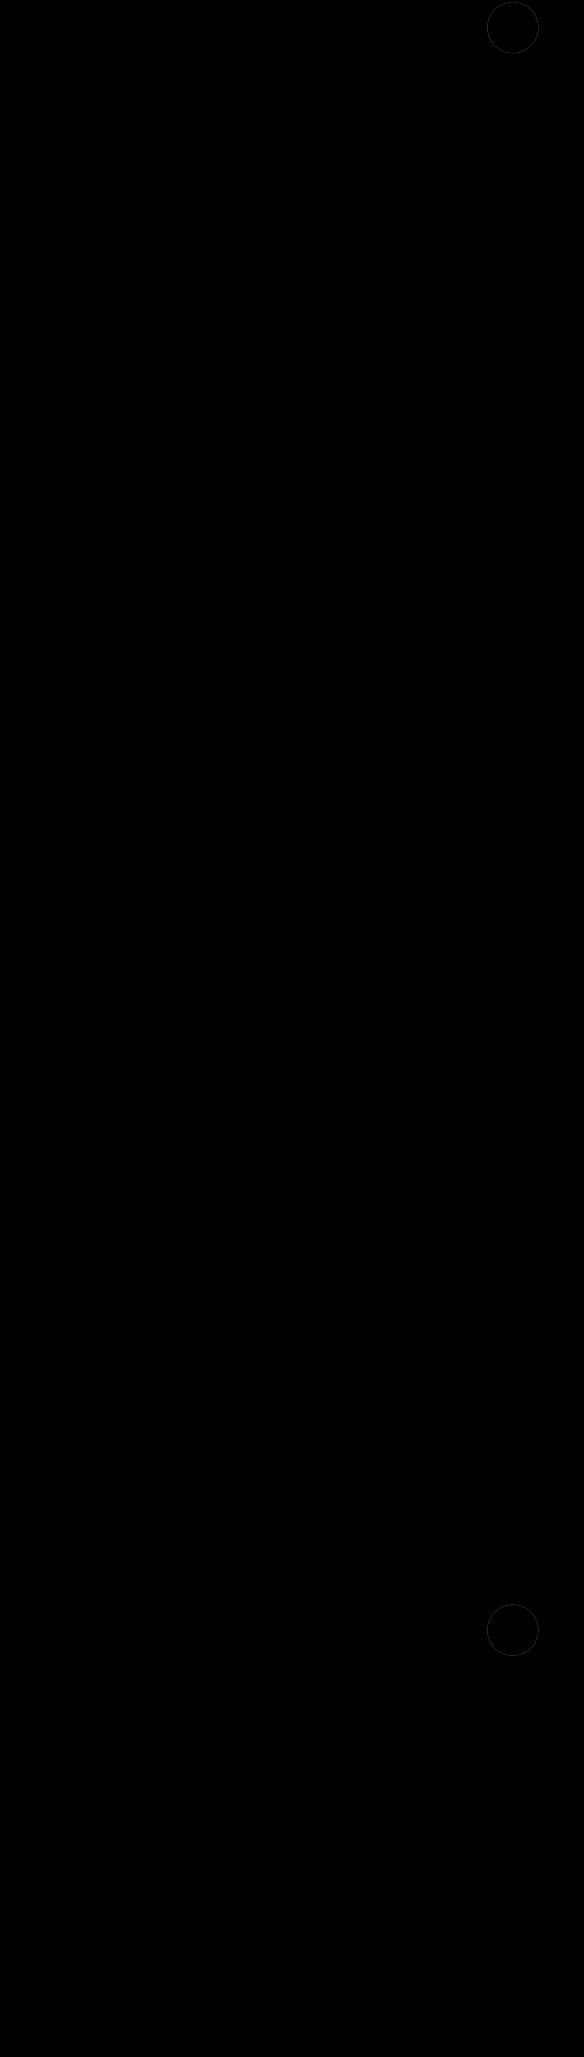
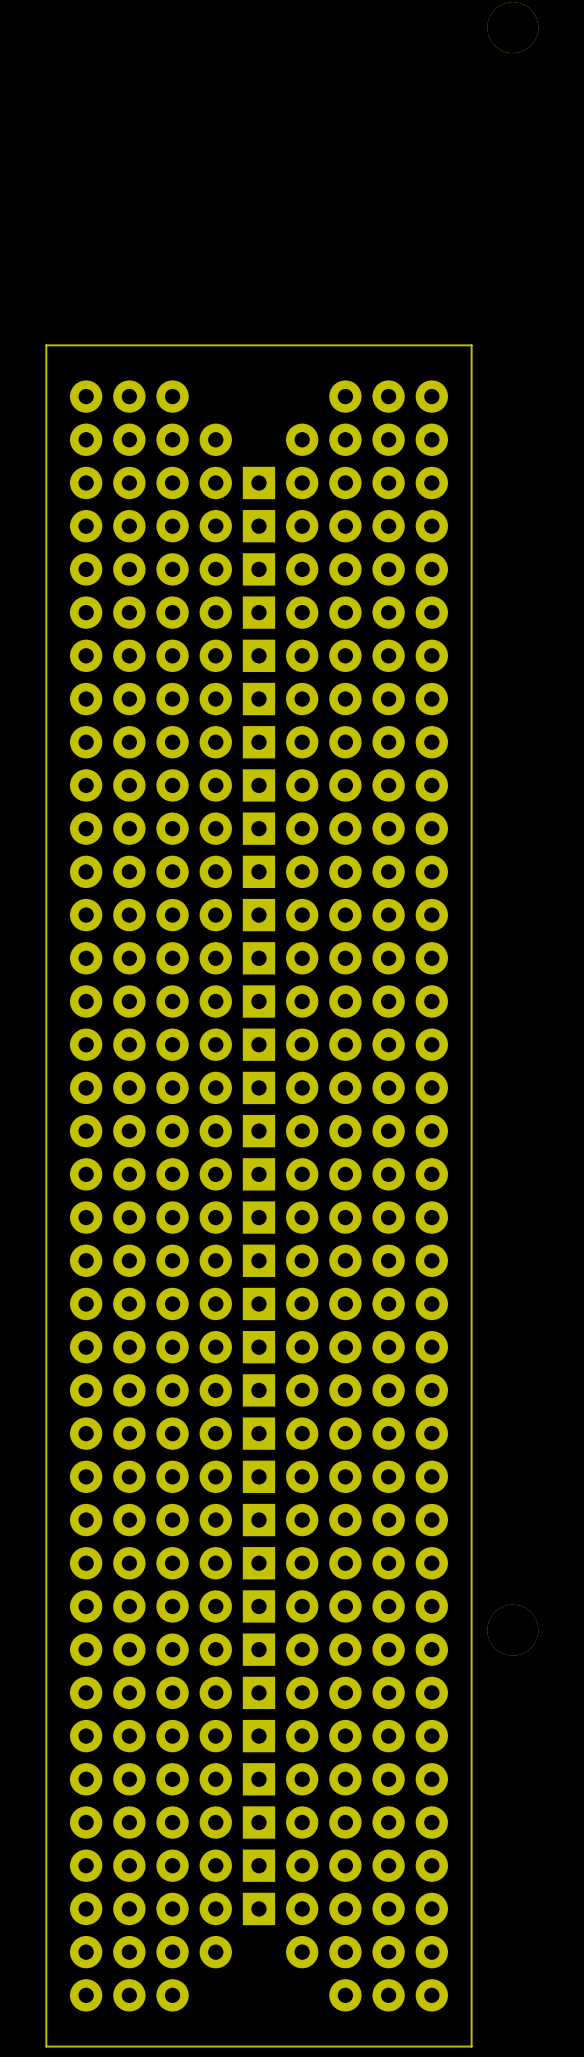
board edge: none -> (471, 345) (46, 345) (46, 2046) (471, 2046) (471, 345)
part: none -> (86, 396)
part: none -> (129, 396)
part: none -> (172, 396)
part: none -> (345, 396)
part: none -> (388, 396)
part: none -> (431, 396)
part: none -> (86, 439)
part: none -> (129, 439)
part: none -> (172, 439)
part: none -> (215, 439)
part: none -> (302, 439)
part: none -> (345, 439)
part: none -> (388, 439)
part: none -> (431, 439)
part: none -> (86, 482)
part: none -> (129, 482)
part: none -> (172, 482)
part: none -> (215, 482)
part: none -> (258, 482)
part: none -> (302, 482)
part: none -> (345, 482)
part: none -> (388, 482)
part: none -> (431, 482)
part: none -> (86, 526)
part: none -> (129, 526)
part: none -> (172, 526)
part: none -> (215, 526)
part: none -> (258, 526)
part: none -> (302, 526)
part: none -> (345, 526)
part: none -> (388, 526)
part: none -> (431, 526)
part: none -> (86, 569)
part: none -> (129, 569)
part: none -> (172, 569)
part: none -> (215, 569)
part: none -> (258, 569)
part: none -> (302, 569)
part: none -> (345, 569)
part: none -> (388, 569)
part: none -> (431, 569)
part: none -> (86, 612)
part: none -> (129, 612)
part: none -> (172, 612)
part: none -> (215, 612)
part: none -> (258, 612)
part: none -> (302, 612)
part: none -> (345, 612)
part: none -> (388, 612)
part: none -> (431, 612)
part: none -> (86, 655)
part: none -> (129, 655)
part: none -> (172, 655)
part: none -> (215, 655)
part: none -> (258, 655)
part: none -> (302, 655)
part: none -> (345, 655)
part: none -> (388, 655)
part: none -> (431, 655)
part: none -> (86, 699)
part: none -> (129, 699)
part: none -> (172, 699)
part: none -> (215, 699)
part: none -> (258, 699)
part: none -> (302, 699)
part: none -> (345, 699)
part: none -> (388, 699)
part: none -> (431, 699)
part: none -> (86, 742)
part: none -> (129, 742)
part: none -> (172, 742)
part: none -> (215, 742)
part: none -> (258, 742)
part: none -> (302, 742)
part: none -> (345, 742)
part: none -> (388, 742)
part: none -> (431, 742)
part: none -> (86, 785)
part: none -> (129, 785)
part: none -> (172, 785)
part: none -> (215, 785)
part: none -> (258, 785)
part: none -> (302, 785)
part: none -> (345, 785)
part: none -> (388, 785)
part: none -> (431, 785)
part: none -> (86, 828)
part: none -> (129, 828)
part: none -> (172, 828)
part: none -> (215, 828)
part: none -> (258, 828)
part: none -> (302, 828)
part: none -> (345, 828)
part: none -> (388, 828)
part: none -> (431, 828)
part: none -> (86, 871)
part: none -> (129, 871)
part: none -> (172, 871)
part: none -> (215, 871)
part: none -> (258, 871)
part: none -> (302, 871)
part: none -> (345, 871)
part: none -> (388, 871)
part: none -> (431, 871)
part: none -> (86, 915)
part: none -> (129, 915)
part: none -> (172, 915)
part: none -> (215, 915)
part: none -> (258, 915)
part: none -> (302, 915)
part: none -> (345, 915)
part: none -> (388, 915)
part: none -> (431, 915)
part: none -> (86, 958)
part: none -> (129, 958)
part: none -> (172, 958)
part: none -> (215, 958)
part: none -> (258, 958)
part: none -> (302, 958)
part: none -> (345, 958)
part: none -> (388, 958)
part: none -> (431, 958)
part: none -> (86, 1001)
part: none -> (129, 1001)
part: none -> (172, 1001)
part: none -> (215, 1001)
part: none -> (258, 1001)
part: none -> (302, 1001)
part: none -> (345, 1001)
part: none -> (388, 1001)
part: none -> (431, 1001)
part: none -> (86, 1044)
part: none -> (129, 1044)
part: none -> (172, 1044)
part: none -> (215, 1044)
part: none -> (258, 1044)
part: none -> (302, 1044)
part: none -> (345, 1044)
part: none -> (388, 1044)
part: none -> (431, 1044)
part: none -> (86, 1087)
part: none -> (129, 1087)
part: none -> (172, 1087)
part: none -> (215, 1087)
part: none -> (258, 1087)
part: none -> (302, 1087)
part: none -> (345, 1087)
part: none -> (388, 1087)
part: none -> (431, 1087)
part: none -> (86, 1131)
part: none -> (129, 1131)
part: none -> (172, 1131)
part: none -> (215, 1131)
part: none -> (258, 1131)
part: none -> (302, 1131)
part: none -> (345, 1131)
part: none -> (388, 1131)
part: none -> (431, 1131)
part: none -> (86, 1174)
part: none -> (129, 1174)
part: none -> (172, 1174)
part: none -> (215, 1174)
part: none -> (258, 1174)
part: none -> (302, 1174)
part: none -> (345, 1174)
part: none -> (388, 1174)
part: none -> (431, 1174)
part: none -> (86, 1217)
part: none -> (129, 1217)
part: none -> (172, 1217)
part: none -> (215, 1217)
part: none -> (258, 1217)
part: none -> (302, 1217)
part: none -> (345, 1217)
part: none -> (388, 1217)
part: none -> (431, 1217)
part: none -> (86, 1260)
part: none -> (129, 1260)
part: none -> (172, 1260)
part: none -> (215, 1260)
part: none -> (258, 1260)
part: none -> (302, 1260)
part: none -> (345, 1260)
part: none -> (388, 1260)
part: none -> (431, 1260)
part: none -> (86, 1303)
part: none -> (129, 1303)
part: none -> (172, 1303)
part: none -> (215, 1303)
part: none -> (258, 1303)
part: none -> (302, 1303)
part: none -> (345, 1303)
part: none -> (388, 1303)
part: none -> (431, 1303)
part: none -> (86, 1347)
part: none -> (129, 1347)
part: none -> (172, 1347)
part: none -> (215, 1347)
part: none -> (258, 1347)
part: none -> (302, 1347)
part: none -> (345, 1347)
part: none -> (388, 1347)
part: none -> (431, 1347)
part: none -> (86, 1390)
part: none -> (129, 1390)
part: none -> (172, 1390)
part: none -> (215, 1390)
part: none -> (258, 1390)
part: none -> (302, 1390)
part: none -> (345, 1390)
part: none -> (388, 1390)
part: none -> (431, 1390)
part: none -> (86, 1433)
part: none -> (129, 1433)
part: none -> (172, 1433)
part: none -> (215, 1433)
part: none -> (258, 1433)
part: none -> (302, 1433)
part: none -> (345, 1433)
part: none -> (388, 1433)
part: none -> (431, 1433)
part: none -> (86, 1476)
part: none -> (129, 1476)
part: none -> (172, 1476)
part: none -> (215, 1476)
part: none -> (258, 1476)
part: none -> (302, 1476)
part: none -> (345, 1476)
part: none -> (388, 1476)
part: none -> (431, 1476)
part: none -> (86, 1520)
part: none -> (129, 1520)
part: none -> (172, 1520)
part: none -> (215, 1520)
part: none -> (258, 1520)
part: none -> (302, 1520)
part: none -> (345, 1520)
part: none -> (388, 1520)
part: none -> (431, 1520)
part: none -> (86, 1563)
part: none -> (129, 1563)
part: none -> (172, 1563)
part: none -> (215, 1563)
part: none -> (258, 1563)
part: none -> (302, 1563)
part: none -> (345, 1563)
part: none -> (388, 1563)
part: none -> (431, 1563)
part: none -> (86, 1606)
part: none -> (129, 1606)
part: none -> (172, 1606)
part: none -> (215, 1606)
part: none -> (258, 1606)
part: none -> (302, 1606)
part: none -> (345, 1606)
part: none -> (388, 1606)
part: none -> (431, 1606)
part: none -> (86, 1649)
part: none -> (129, 1649)
part: none -> (172, 1649)
part: none -> (215, 1649)
part: none -> (258, 1649)
part: none -> (302, 1649)
part: none -> (345, 1649)
part: none -> (388, 1649)
part: none -> (431, 1649)
part: none -> (86, 1692)
part: none -> (129, 1692)
part: none -> (172, 1692)
part: none -> (215, 1692)
part: none -> (258, 1692)
part: none -> (302, 1692)
part: none -> (345, 1692)
part: none -> (388, 1692)
part: none -> (431, 1692)
part: none -> (86, 1736)
part: none -> (129, 1736)
part: none -> (172, 1736)
part: none -> (215, 1736)
part: none -> (258, 1736)
part: none -> (302, 1736)
part: none -> (345, 1736)
part: none -> (388, 1736)
part: none -> (431, 1736)
part: none -> (86, 1779)
part: none -> (129, 1779)
part: none -> (172, 1779)
part: none -> (215, 1779)
part: none -> (258, 1779)
part: none -> (302, 1779)
part: none -> (345, 1779)
part: none -> (388, 1779)
part: none -> (431, 1779)
part: none -> (86, 1822)
part: none -> (129, 1822)
part: none -> (172, 1822)
part: none -> (215, 1822)
part: none -> (258, 1822)
part: none -> (302, 1822)
part: none -> (345, 1822)
part: none -> (388, 1822)
part: none -> (431, 1822)
part: none -> (86, 1865)
part: none -> (129, 1865)
part: none -> (172, 1865)
part: none -> (215, 1865)
part: none -> (258, 1865)
part: none -> (302, 1865)
part: none -> (345, 1865)
part: none -> (388, 1865)
part: none -> (431, 1865)
part: none -> (86, 1908)
part: none -> (129, 1908)
part: none -> (172, 1908)
part: none -> (215, 1908)
part: none -> (258, 1908)
part: none -> (302, 1908)
part: none -> (345, 1908)
part: none -> (388, 1908)
part: none -> (431, 1908)
part: none -> (86, 1952)
part: none -> (129, 1952)
part: none -> (172, 1952)
part: none -> (215, 1952)
part: none -> (302, 1952)
part: none -> (345, 1952)
part: none -> (388, 1952)
part: none -> (431, 1952)
part: none -> (86, 1995)
part: none -> (129, 1995)
part: none -> (172, 1995)
part: none -> (345, 1995)
part: none -> (388, 1995)
part: none -> (431, 1995)

